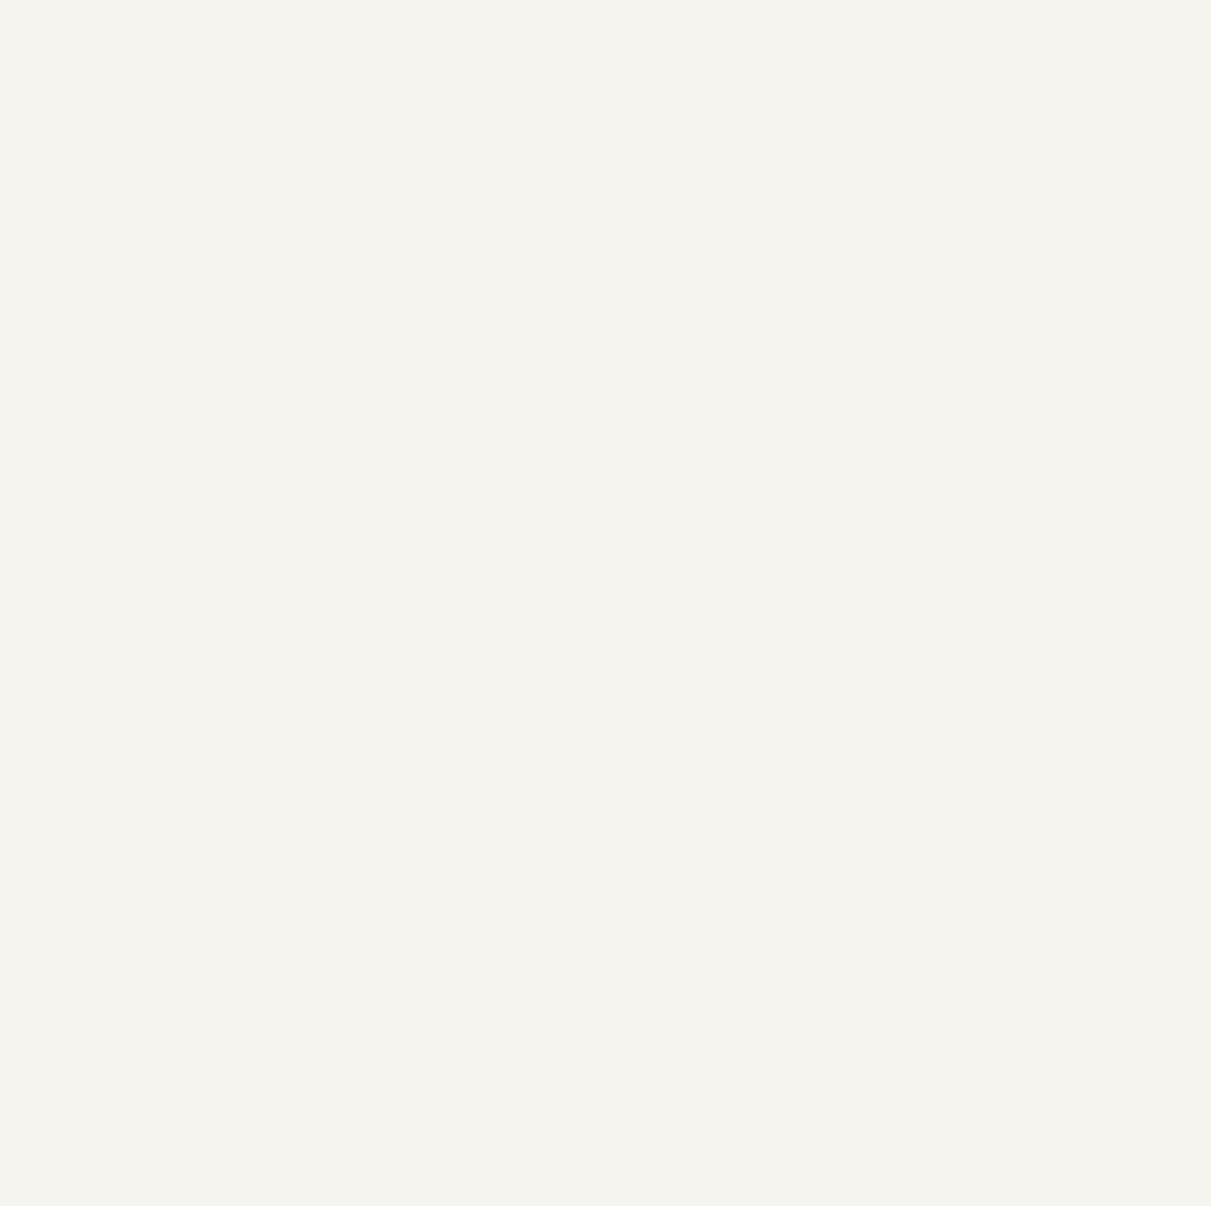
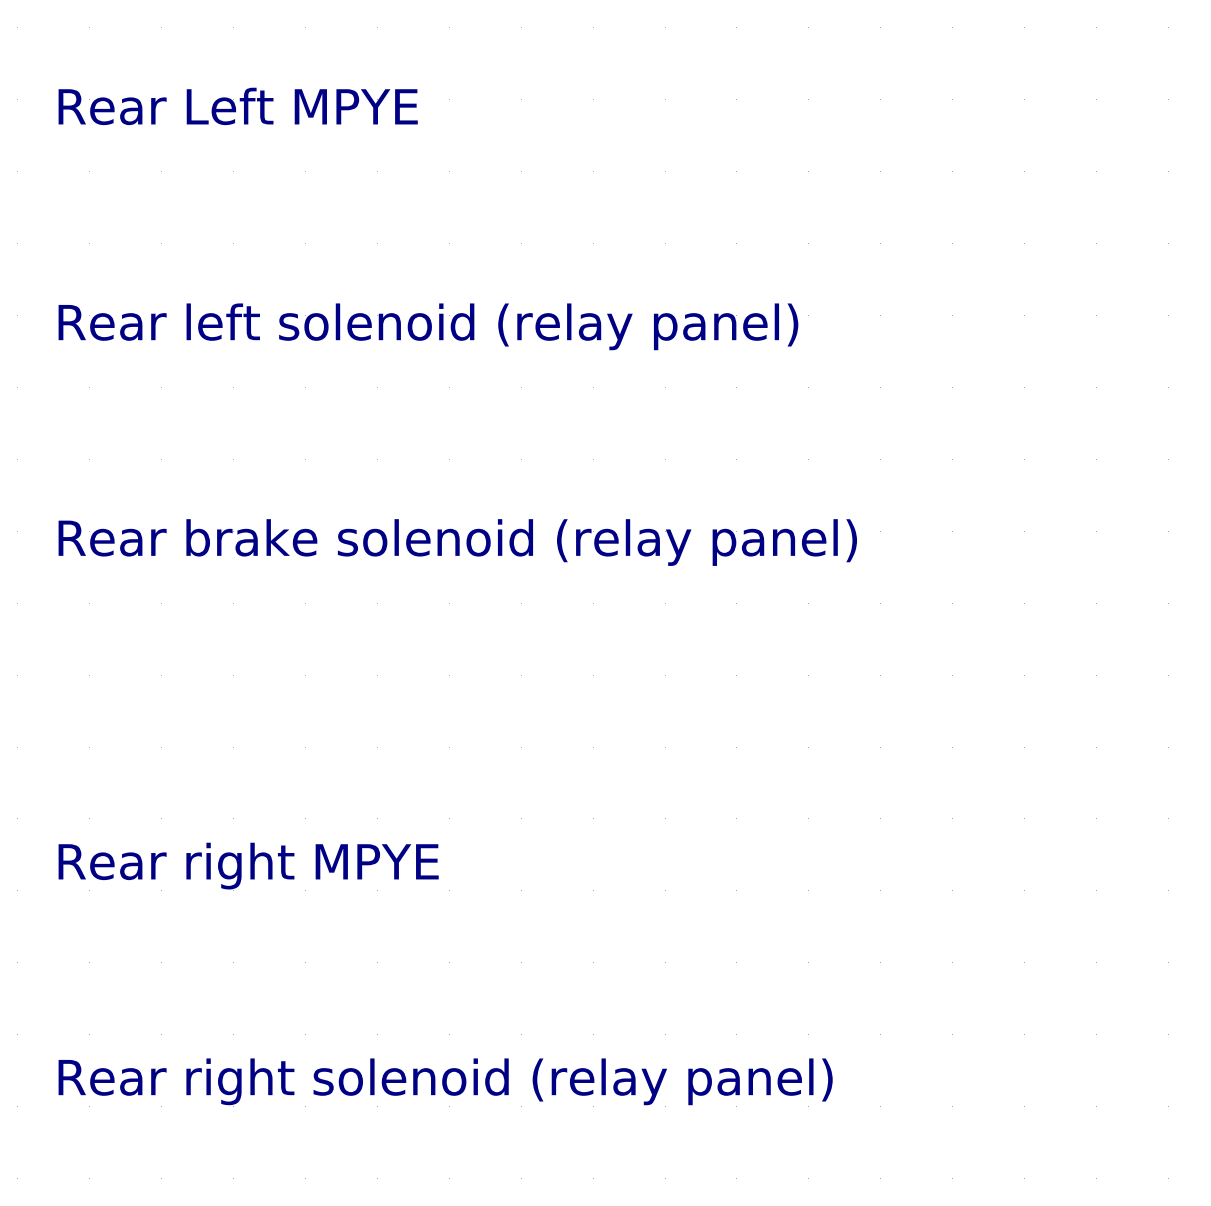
text: none -> Rear Left MPYE (238, 106)
text: none -> Rear left solenoid (relay panel) (428, 326)
text: none -> Rear brake solenoid (relay panel) (457, 542)
text: none -> Rear right MPYE (248, 866)
text: none -> Rear right solenoid (relay panel) (445, 1081)

